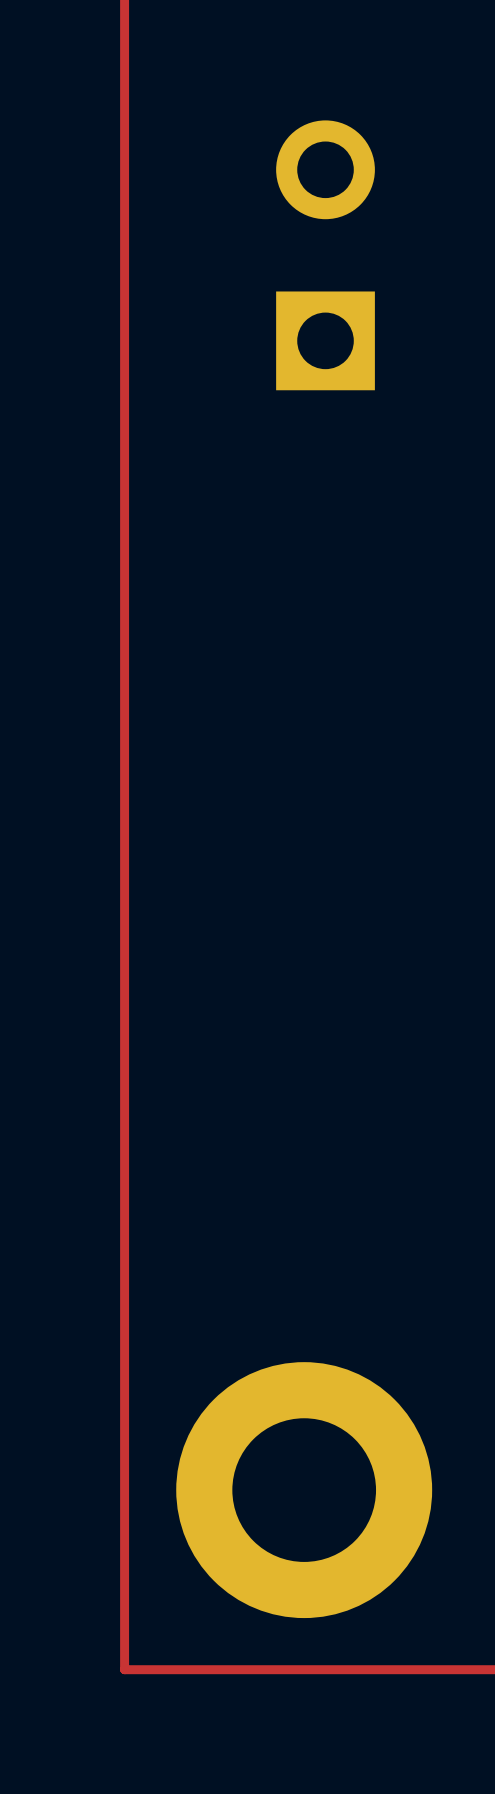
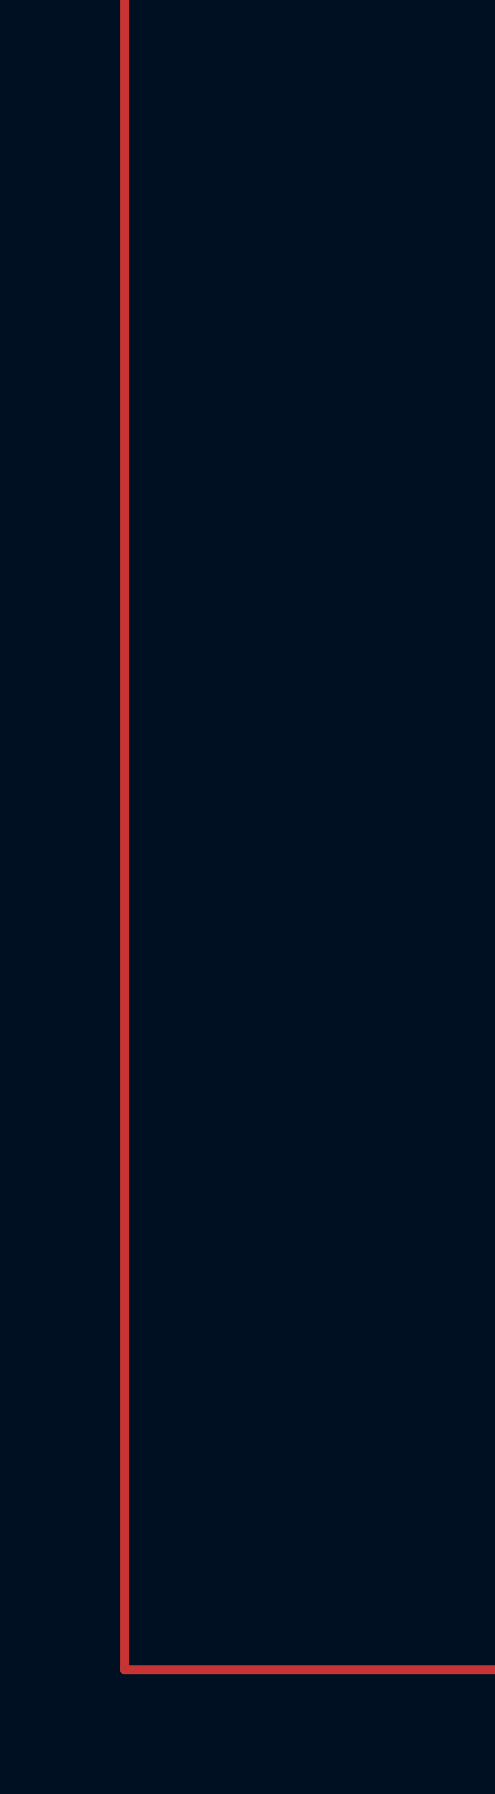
part: (325, 255) -> none
part: (304, 1490) -> none

